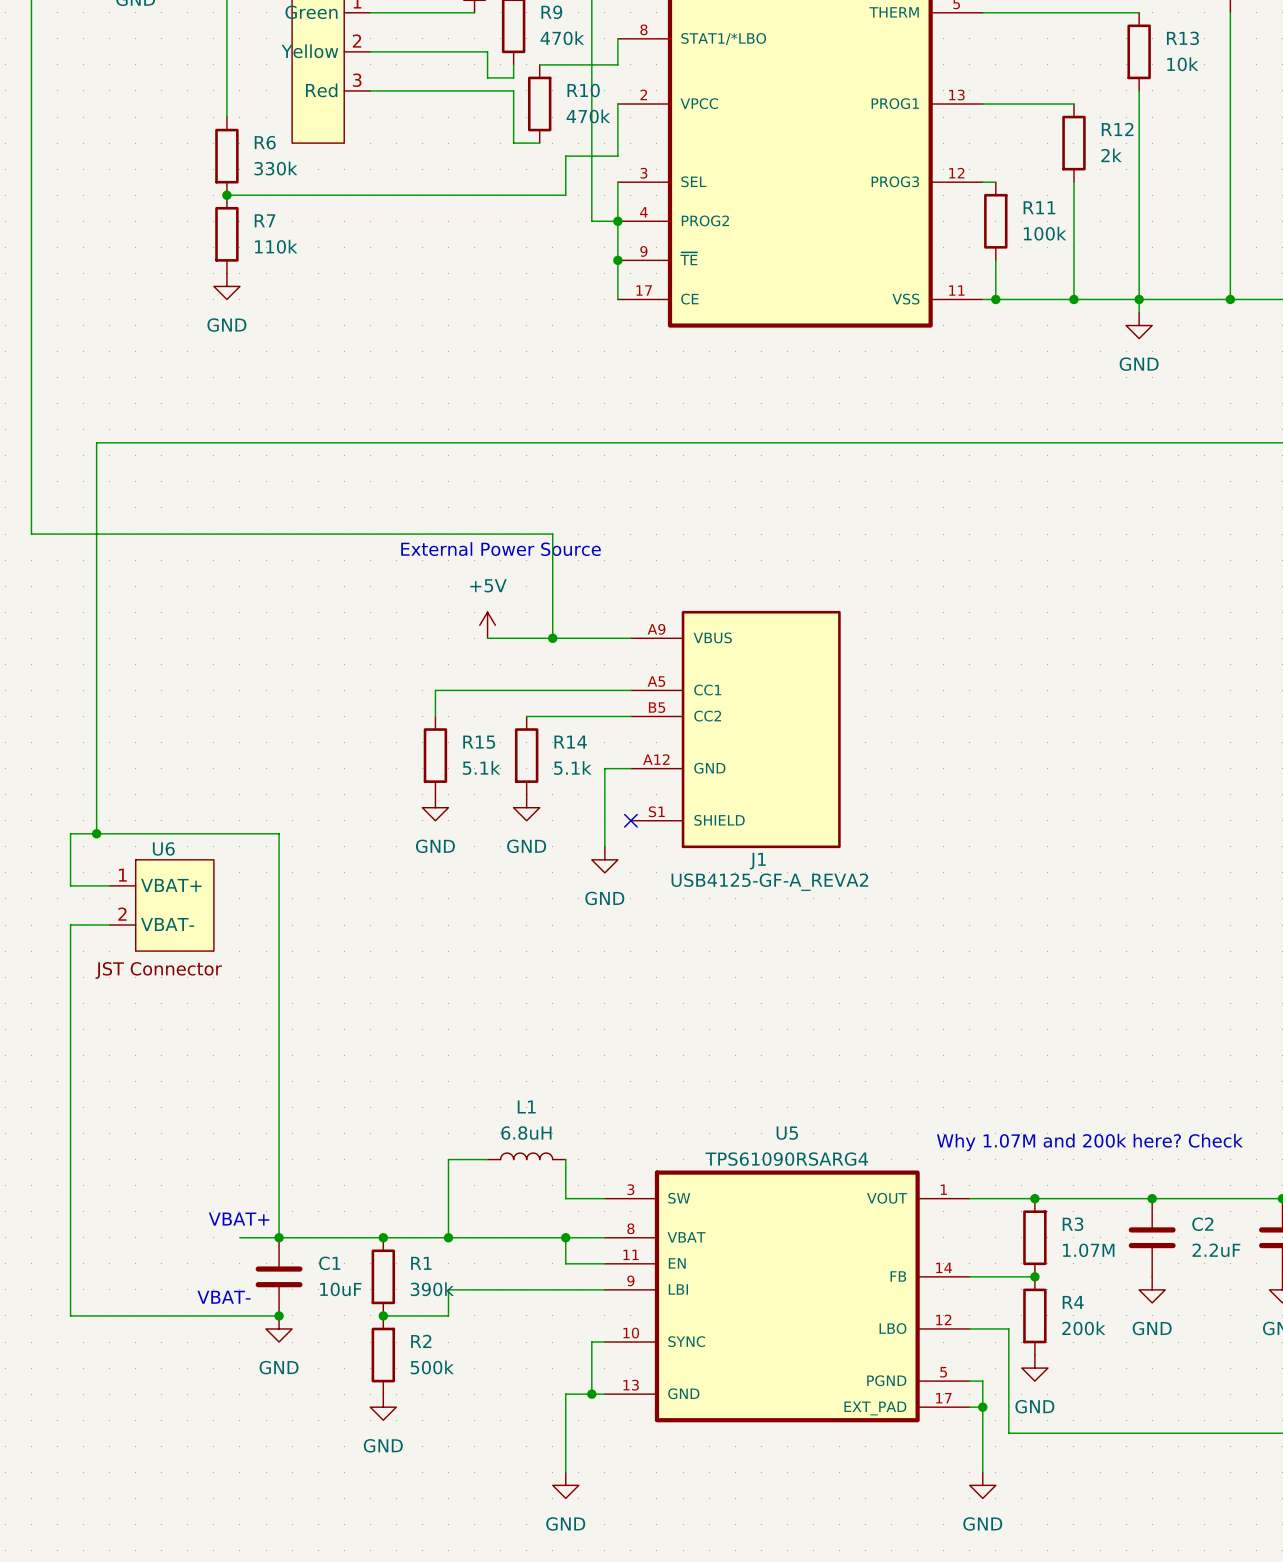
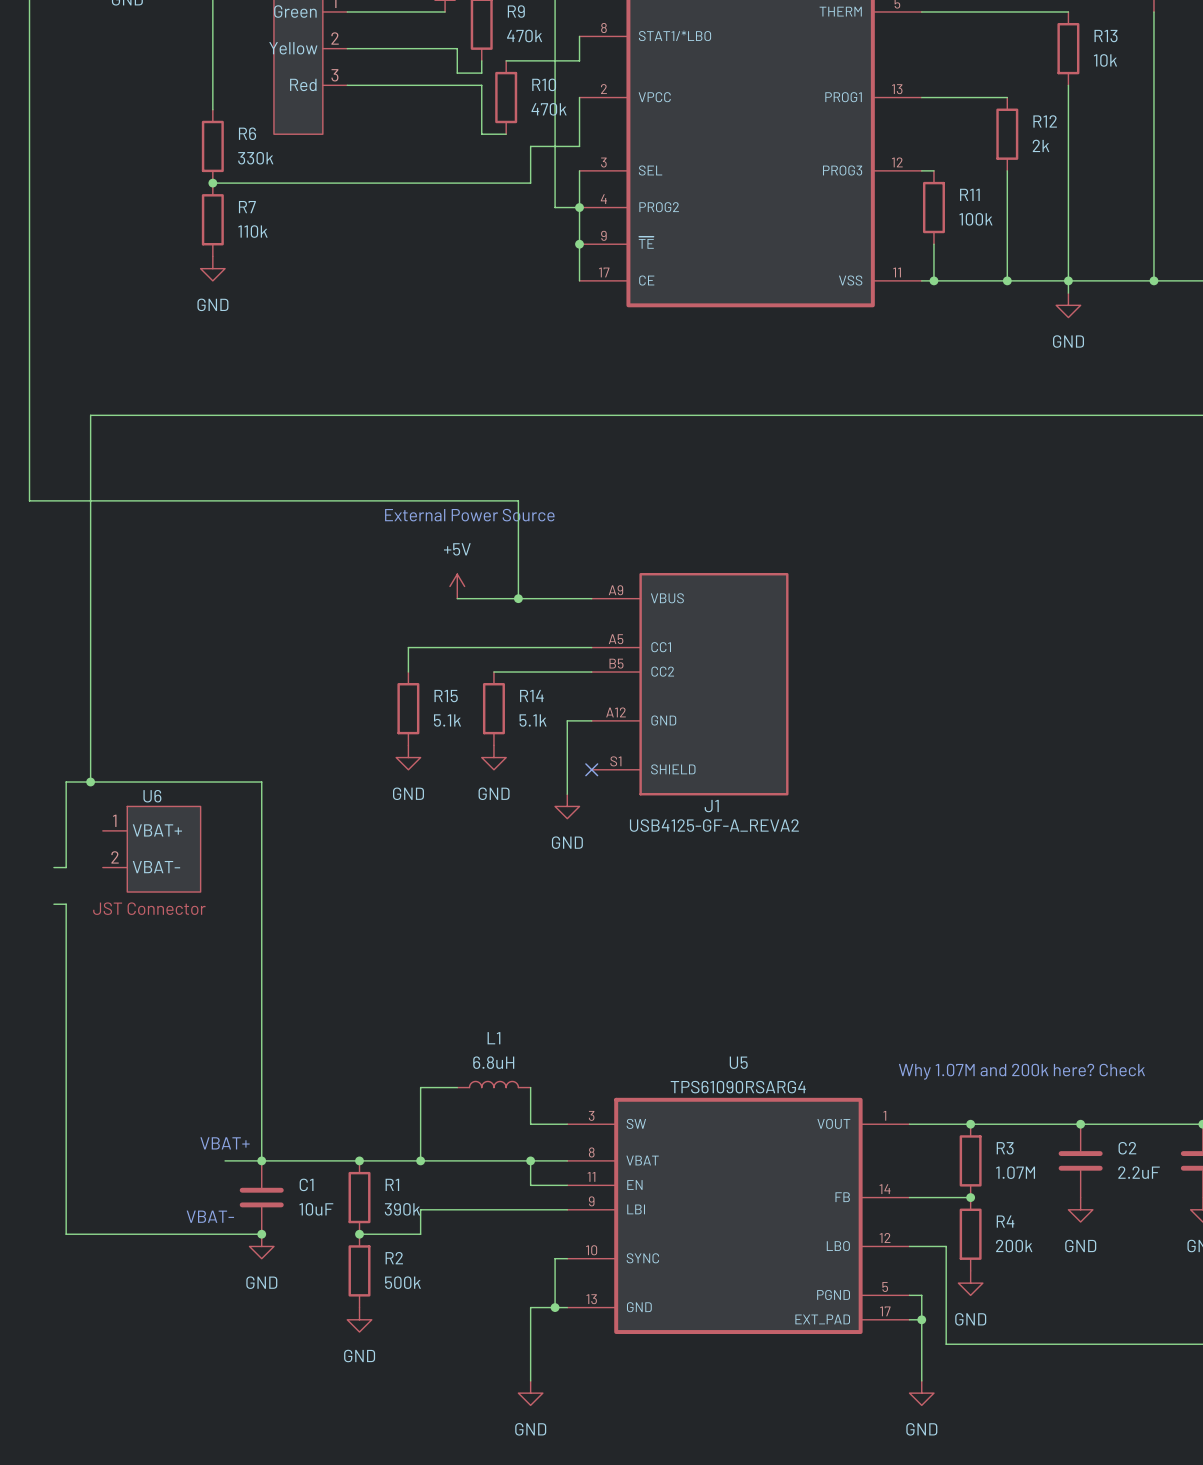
wire: (70, 885) (109, 885) -> (66, 830) (66, 867) (53, 867)
wire: (109, 925) (70, 925) (70, 964) -> (53, 904) (66, 904)

